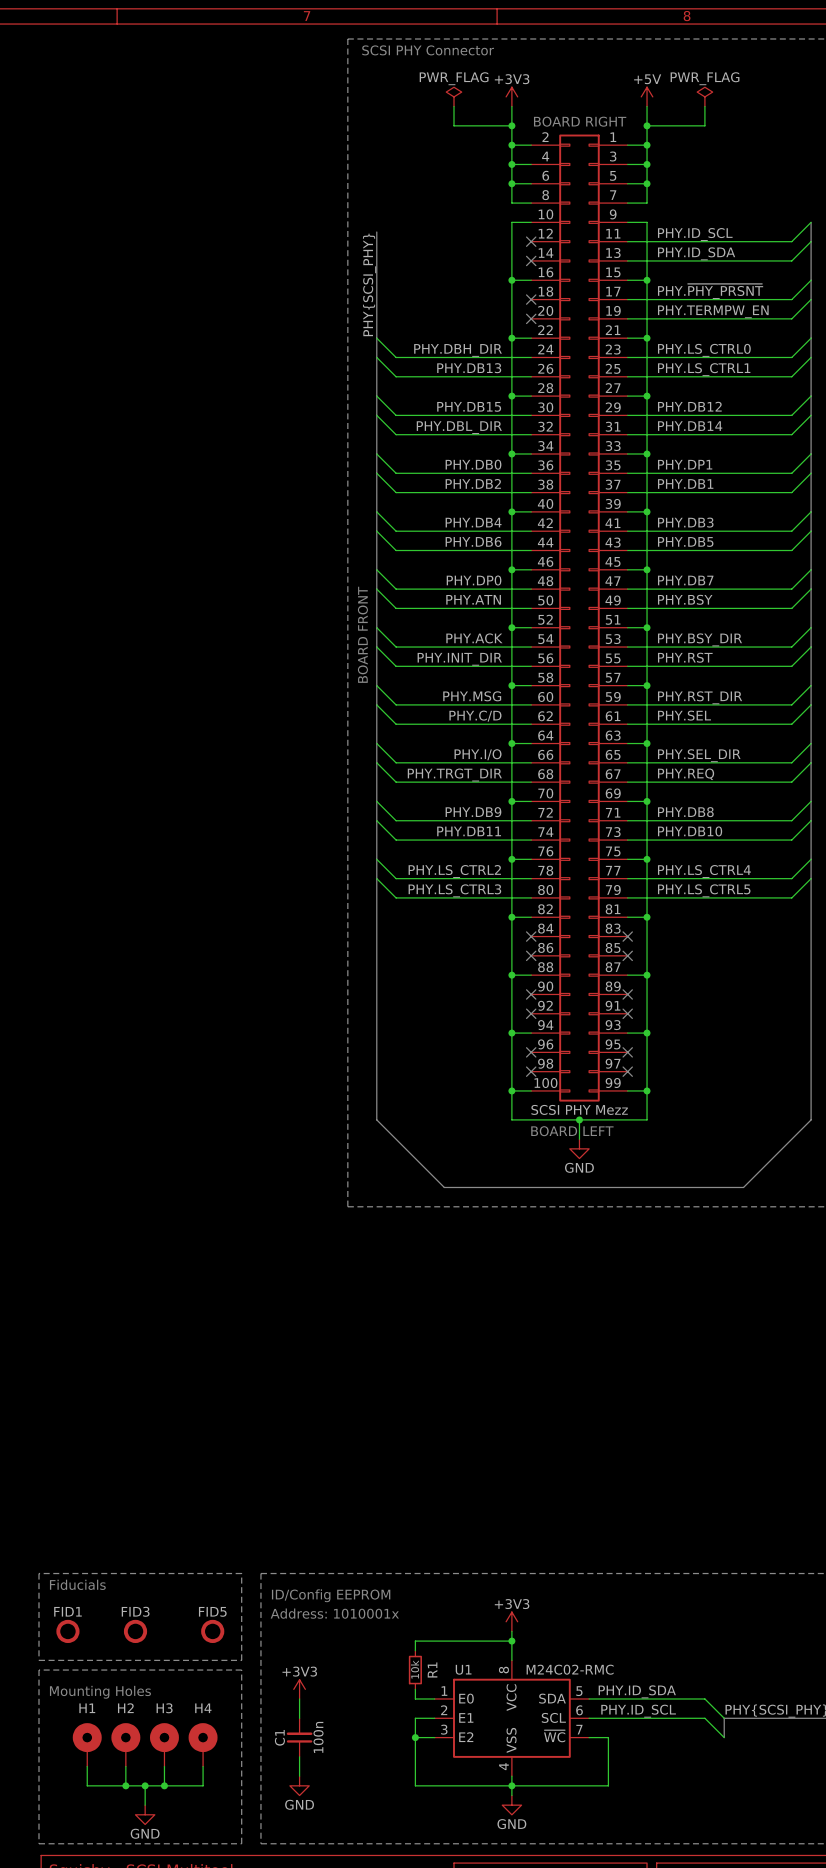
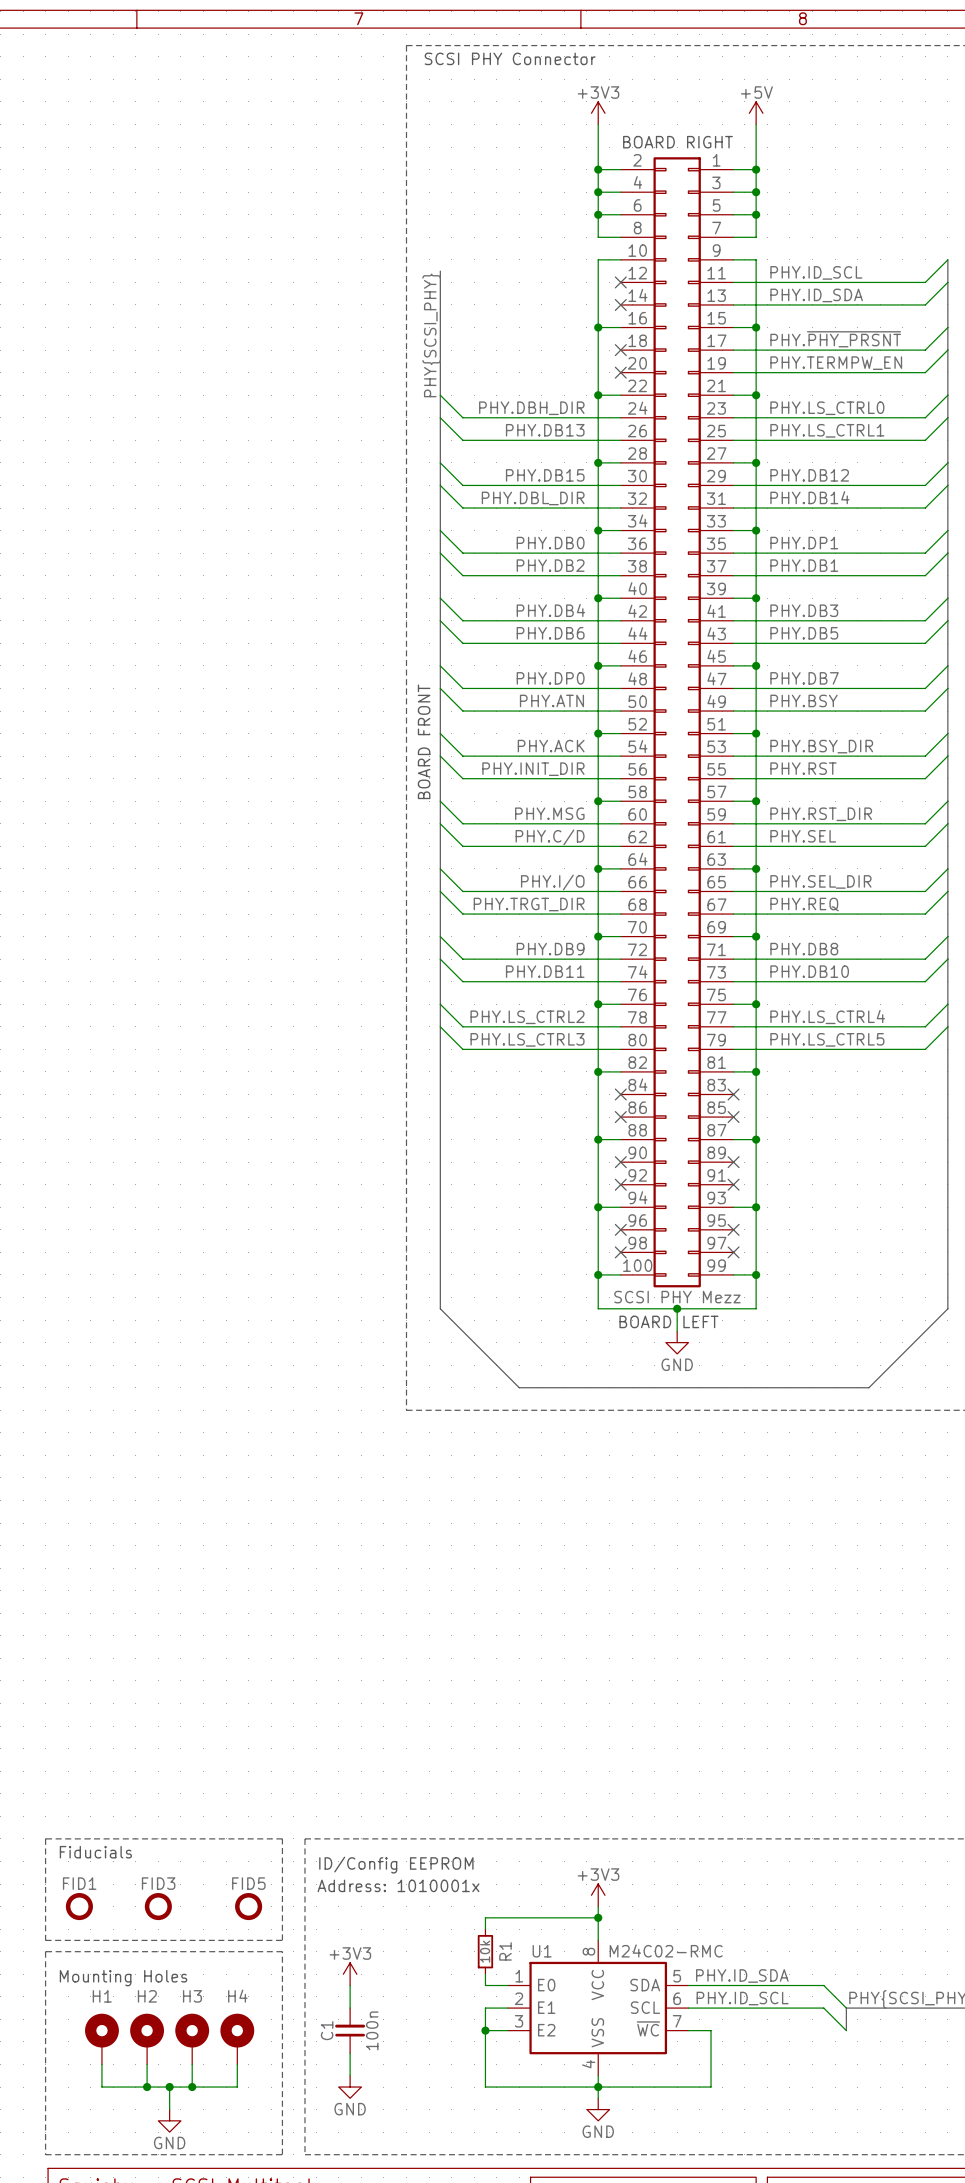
power symbol: PWR_FLAG (453, 96) -> none
power symbol: PWR_FLAG (704, 96) -> none
wire: (453, 106) (453, 125) (511, 125) -> none
wire: (704, 106) (704, 125) (647, 125) -> none
junction: (511, 125) -> none
junction: (647, 125) -> none

